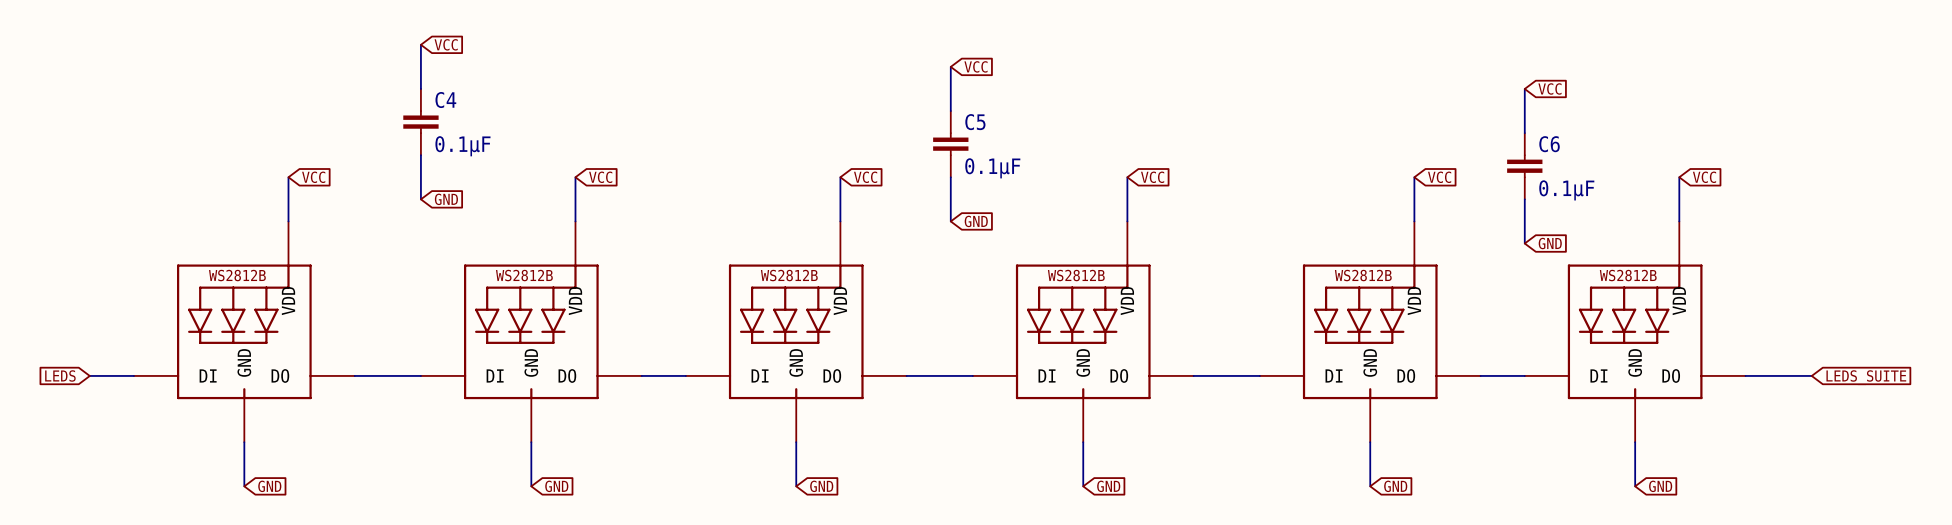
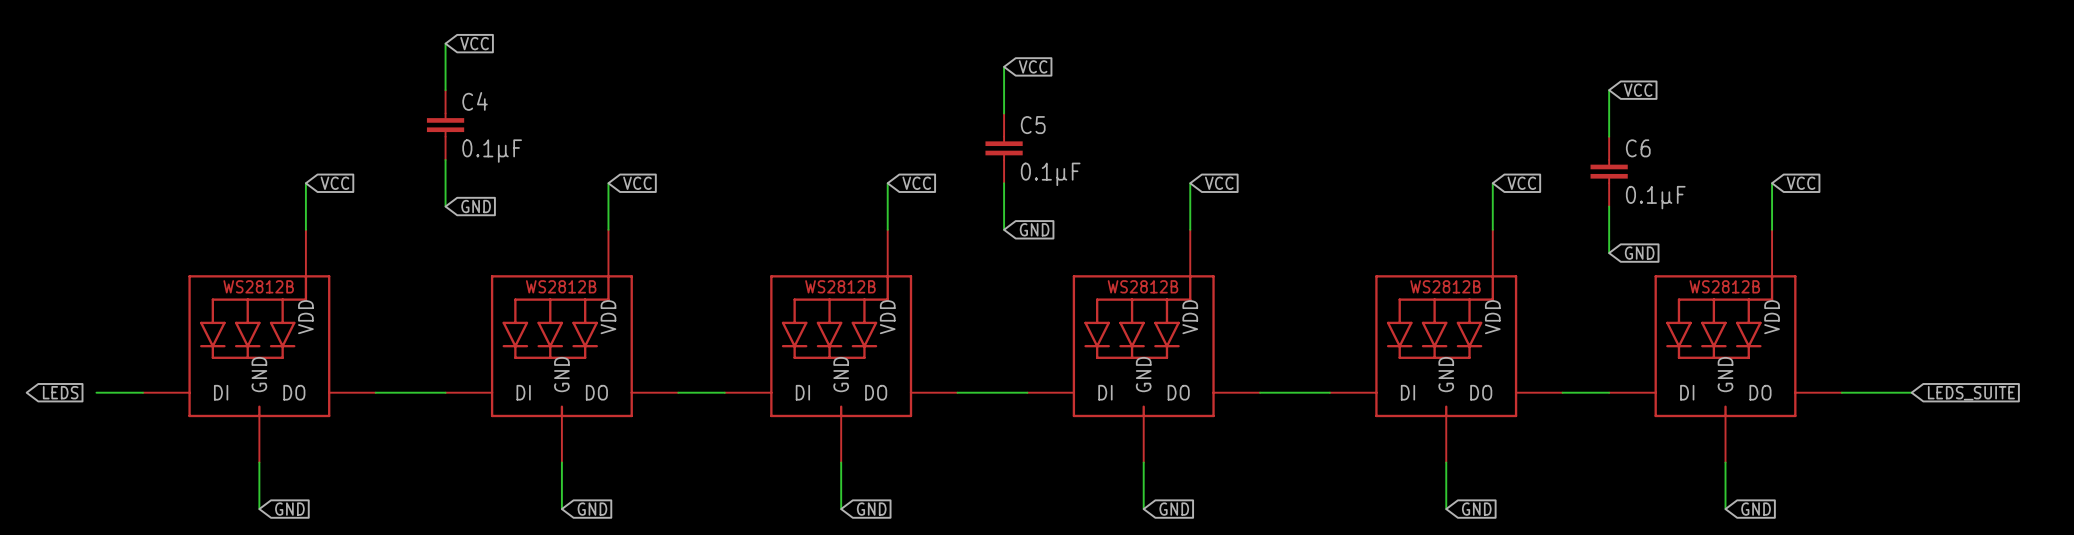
global label rotation: 0° (60, 375) -> 180° (60, 392)

